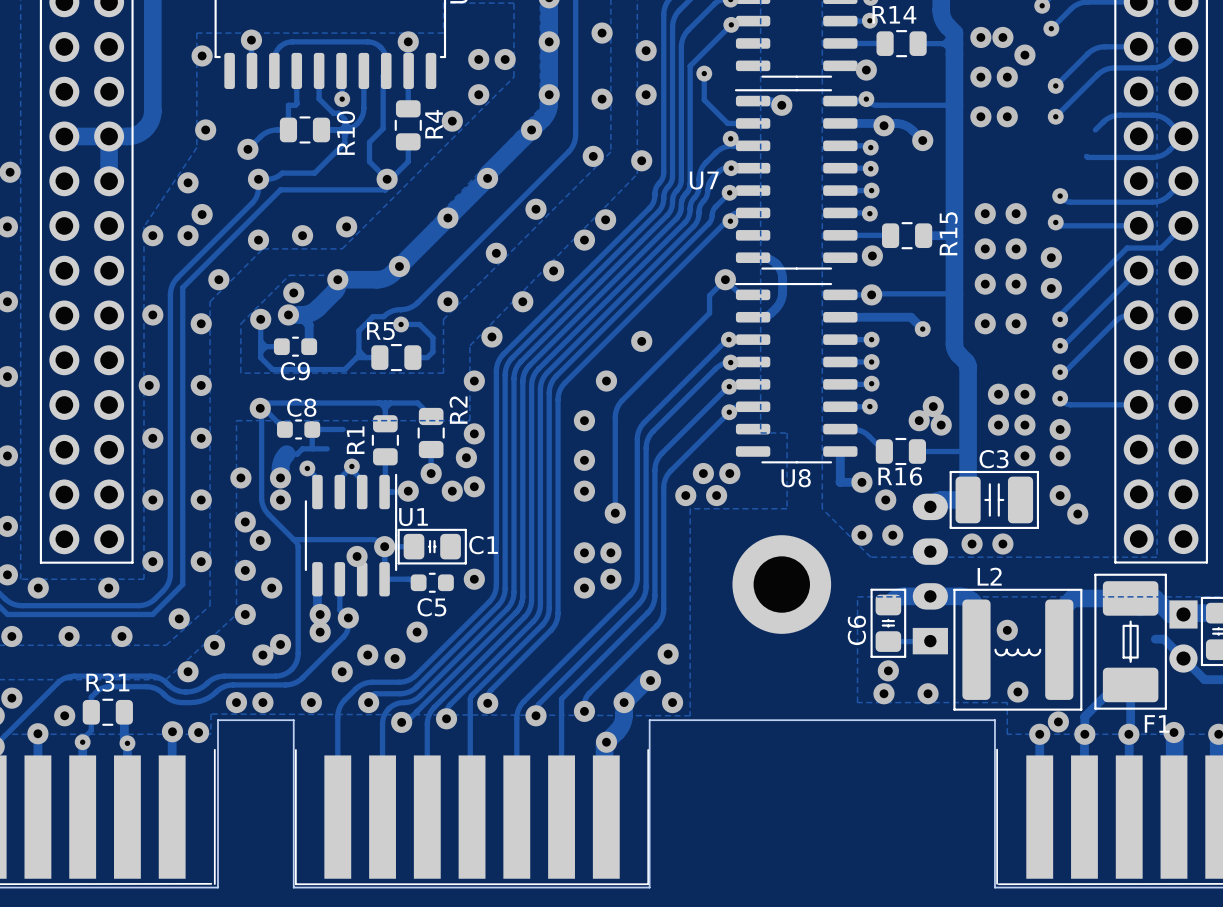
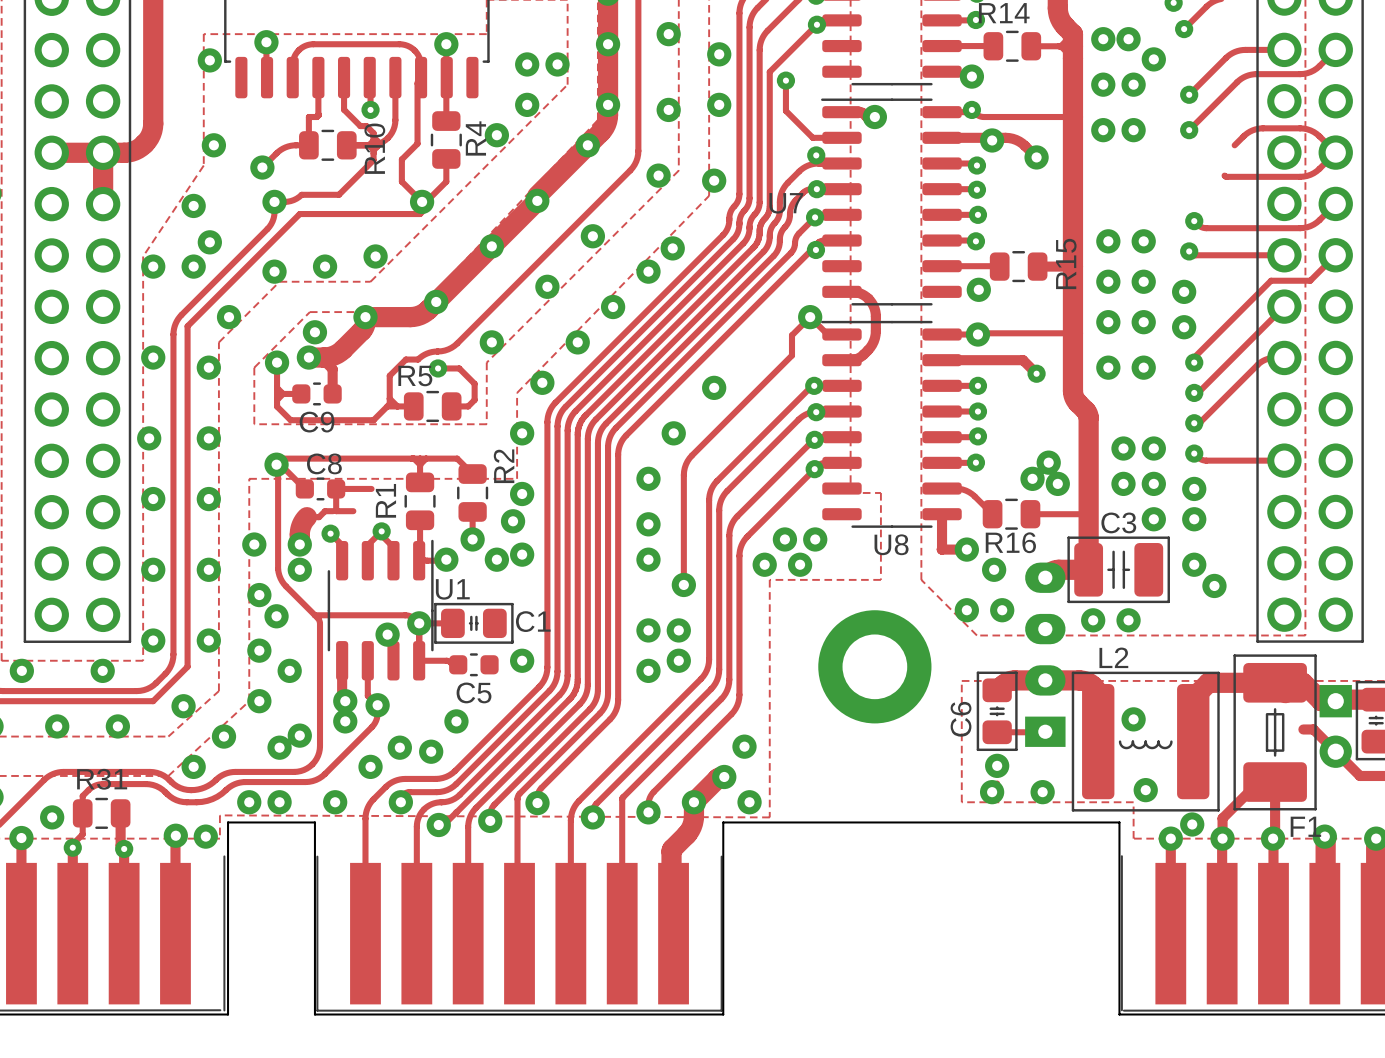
via: (606, 742) -> none

